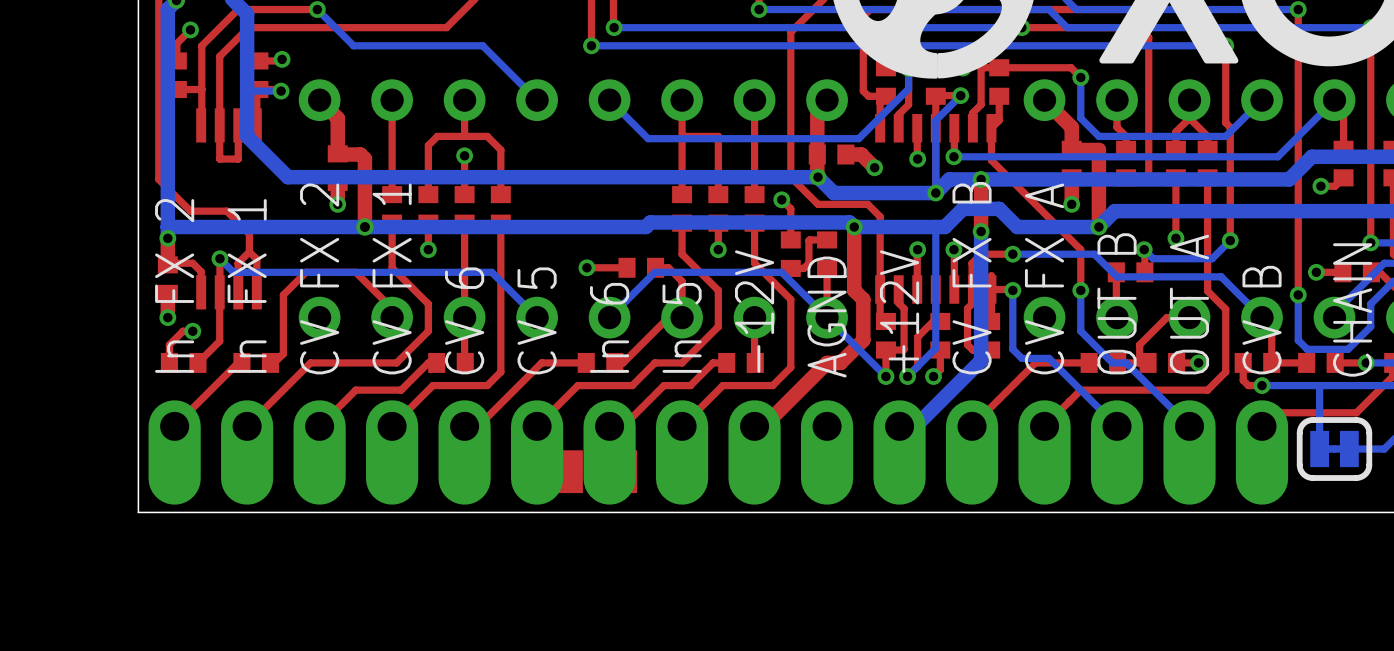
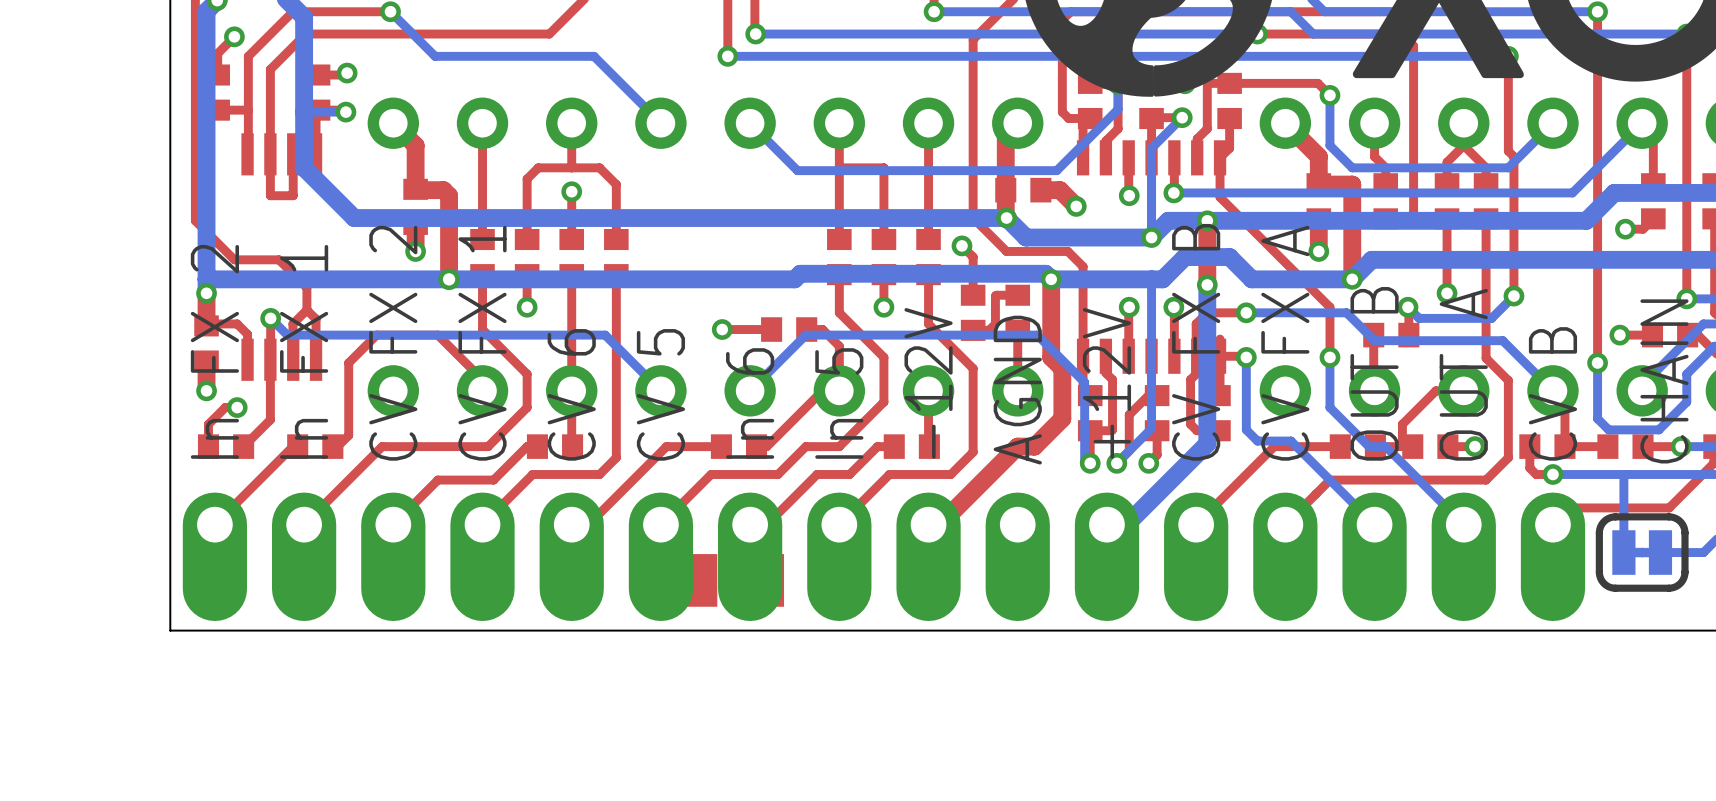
bottom track: (781, 272) (885, 376) -> (961, 335) (1037, 335) (1084, 382) (1084, 463)

